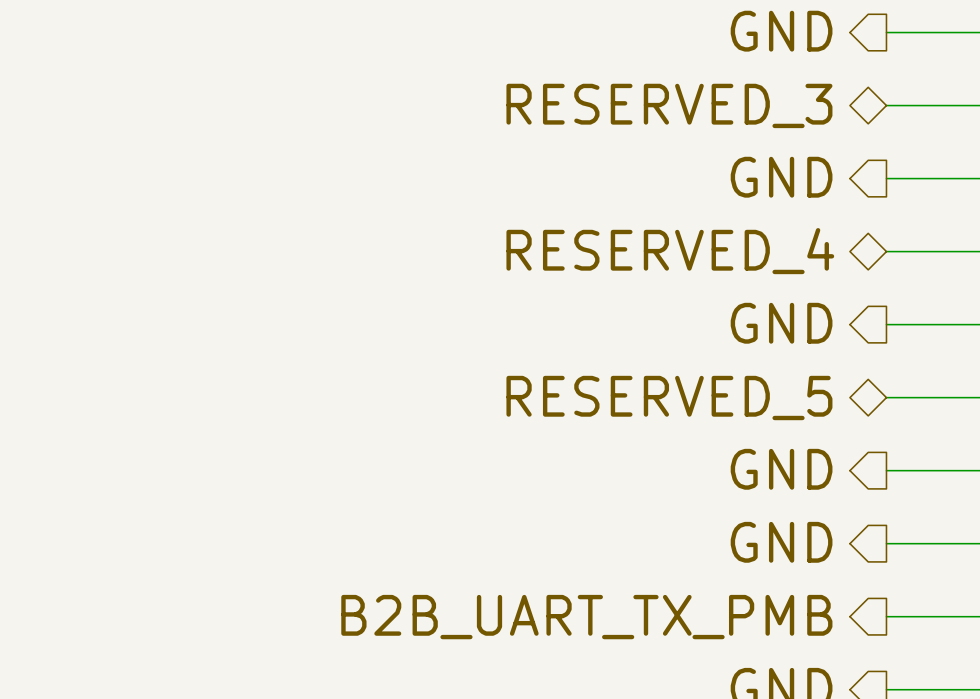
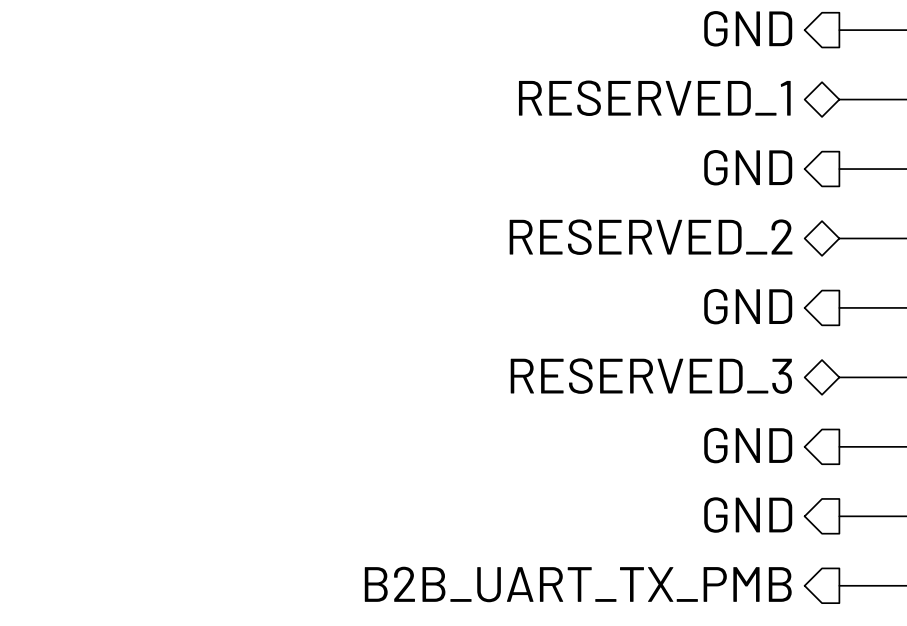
hierarchical label: RESERVED_3 (669, 105) -> RESERVED_1 (654, 98)
hierarchical label: RESERVED_4 (670, 251) -> RESERVED_2 (651, 237)
hierarchical label: RESERVED_5 (669, 398) -> RESERVED_3 (651, 376)

